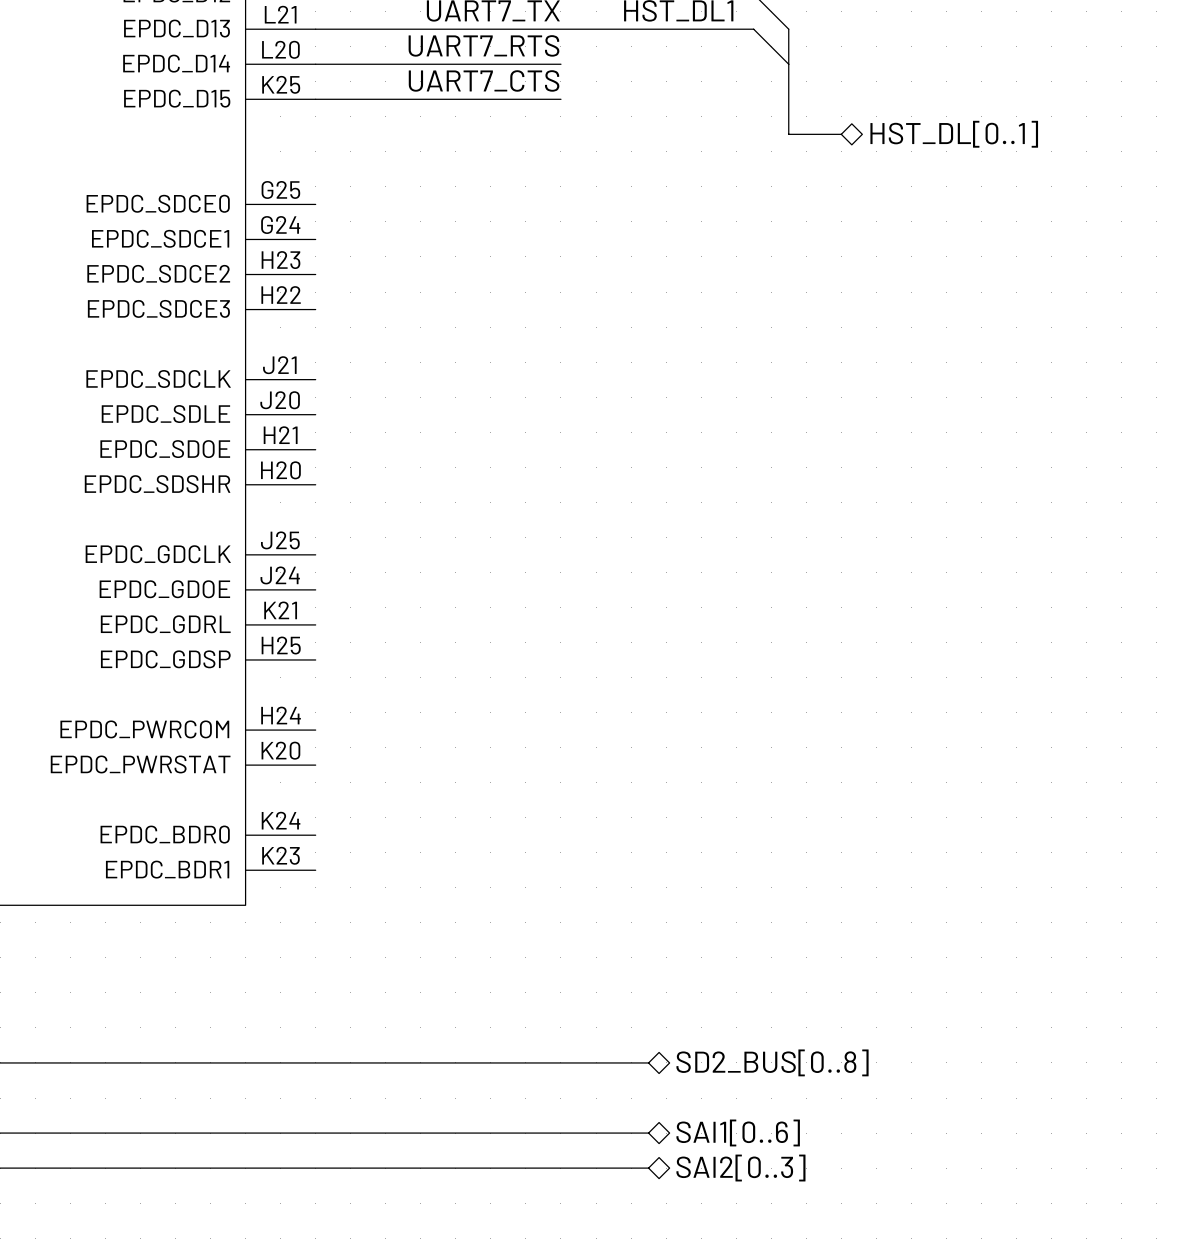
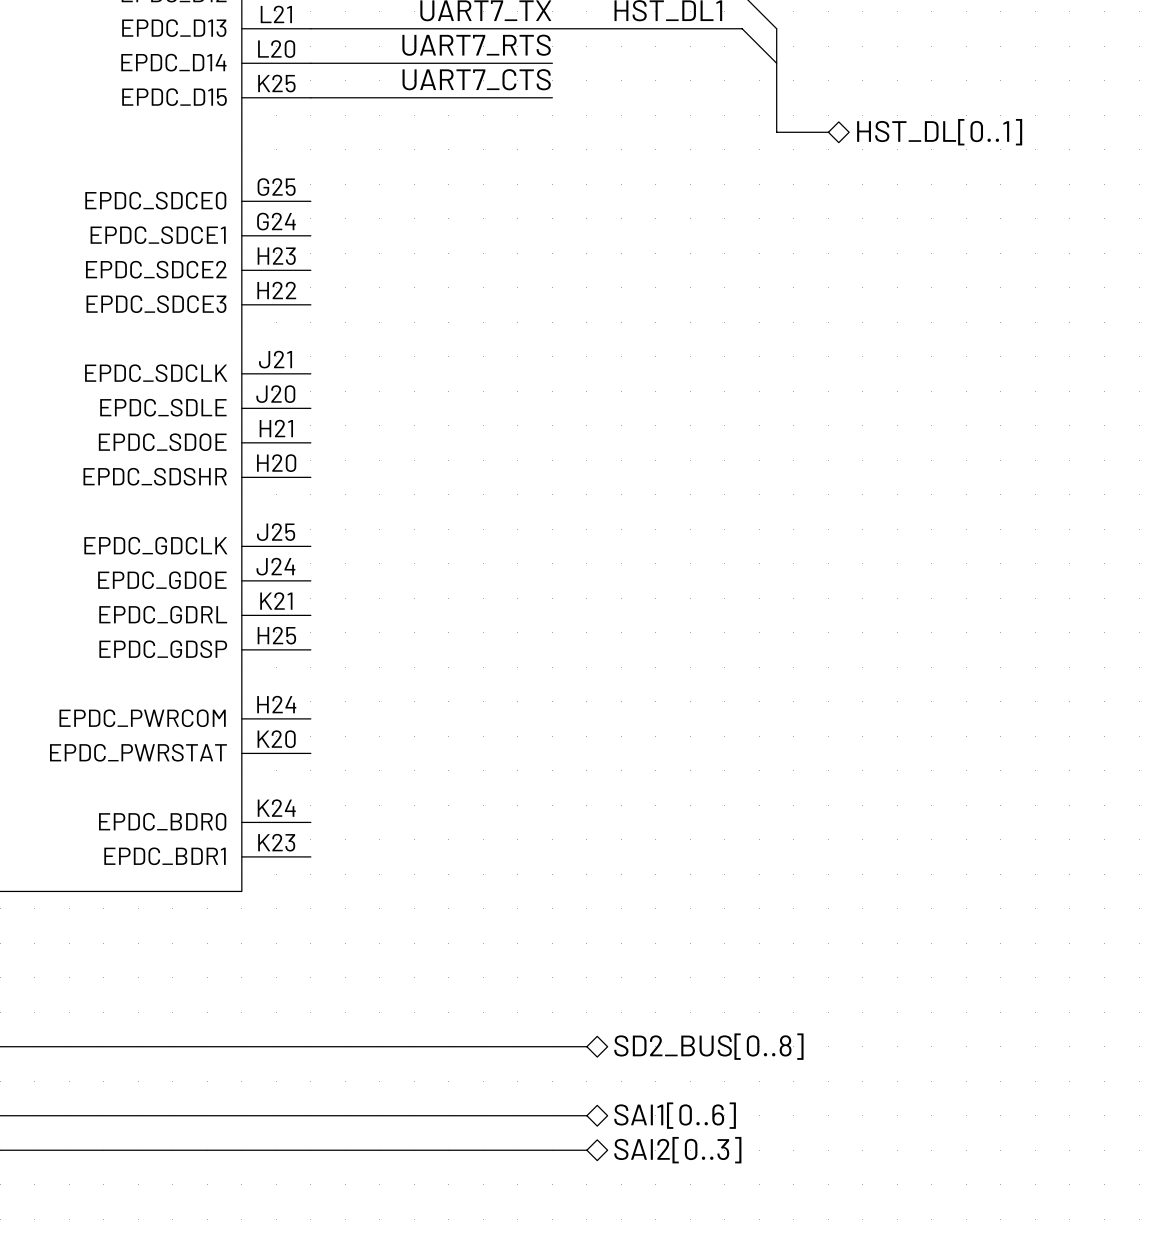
bus: (596, 1062) (648, 1062) -> none
hierarchical label position: SD2_BUS[0..8] (772, 1062) -> SD2_BUS[0..8] (708, 1046)
hierarchical label position: SAI1[0..6] (738, 1132) -> SAI1[0..6] (675, 1115)
bus: (596, 1133) (648, 1133) -> none
bus: (596, 1168) (648, 1168) -> none
hierarchical label position: SAI2[0..3] (740, 1168) -> SAI2[0..3] (677, 1150)

